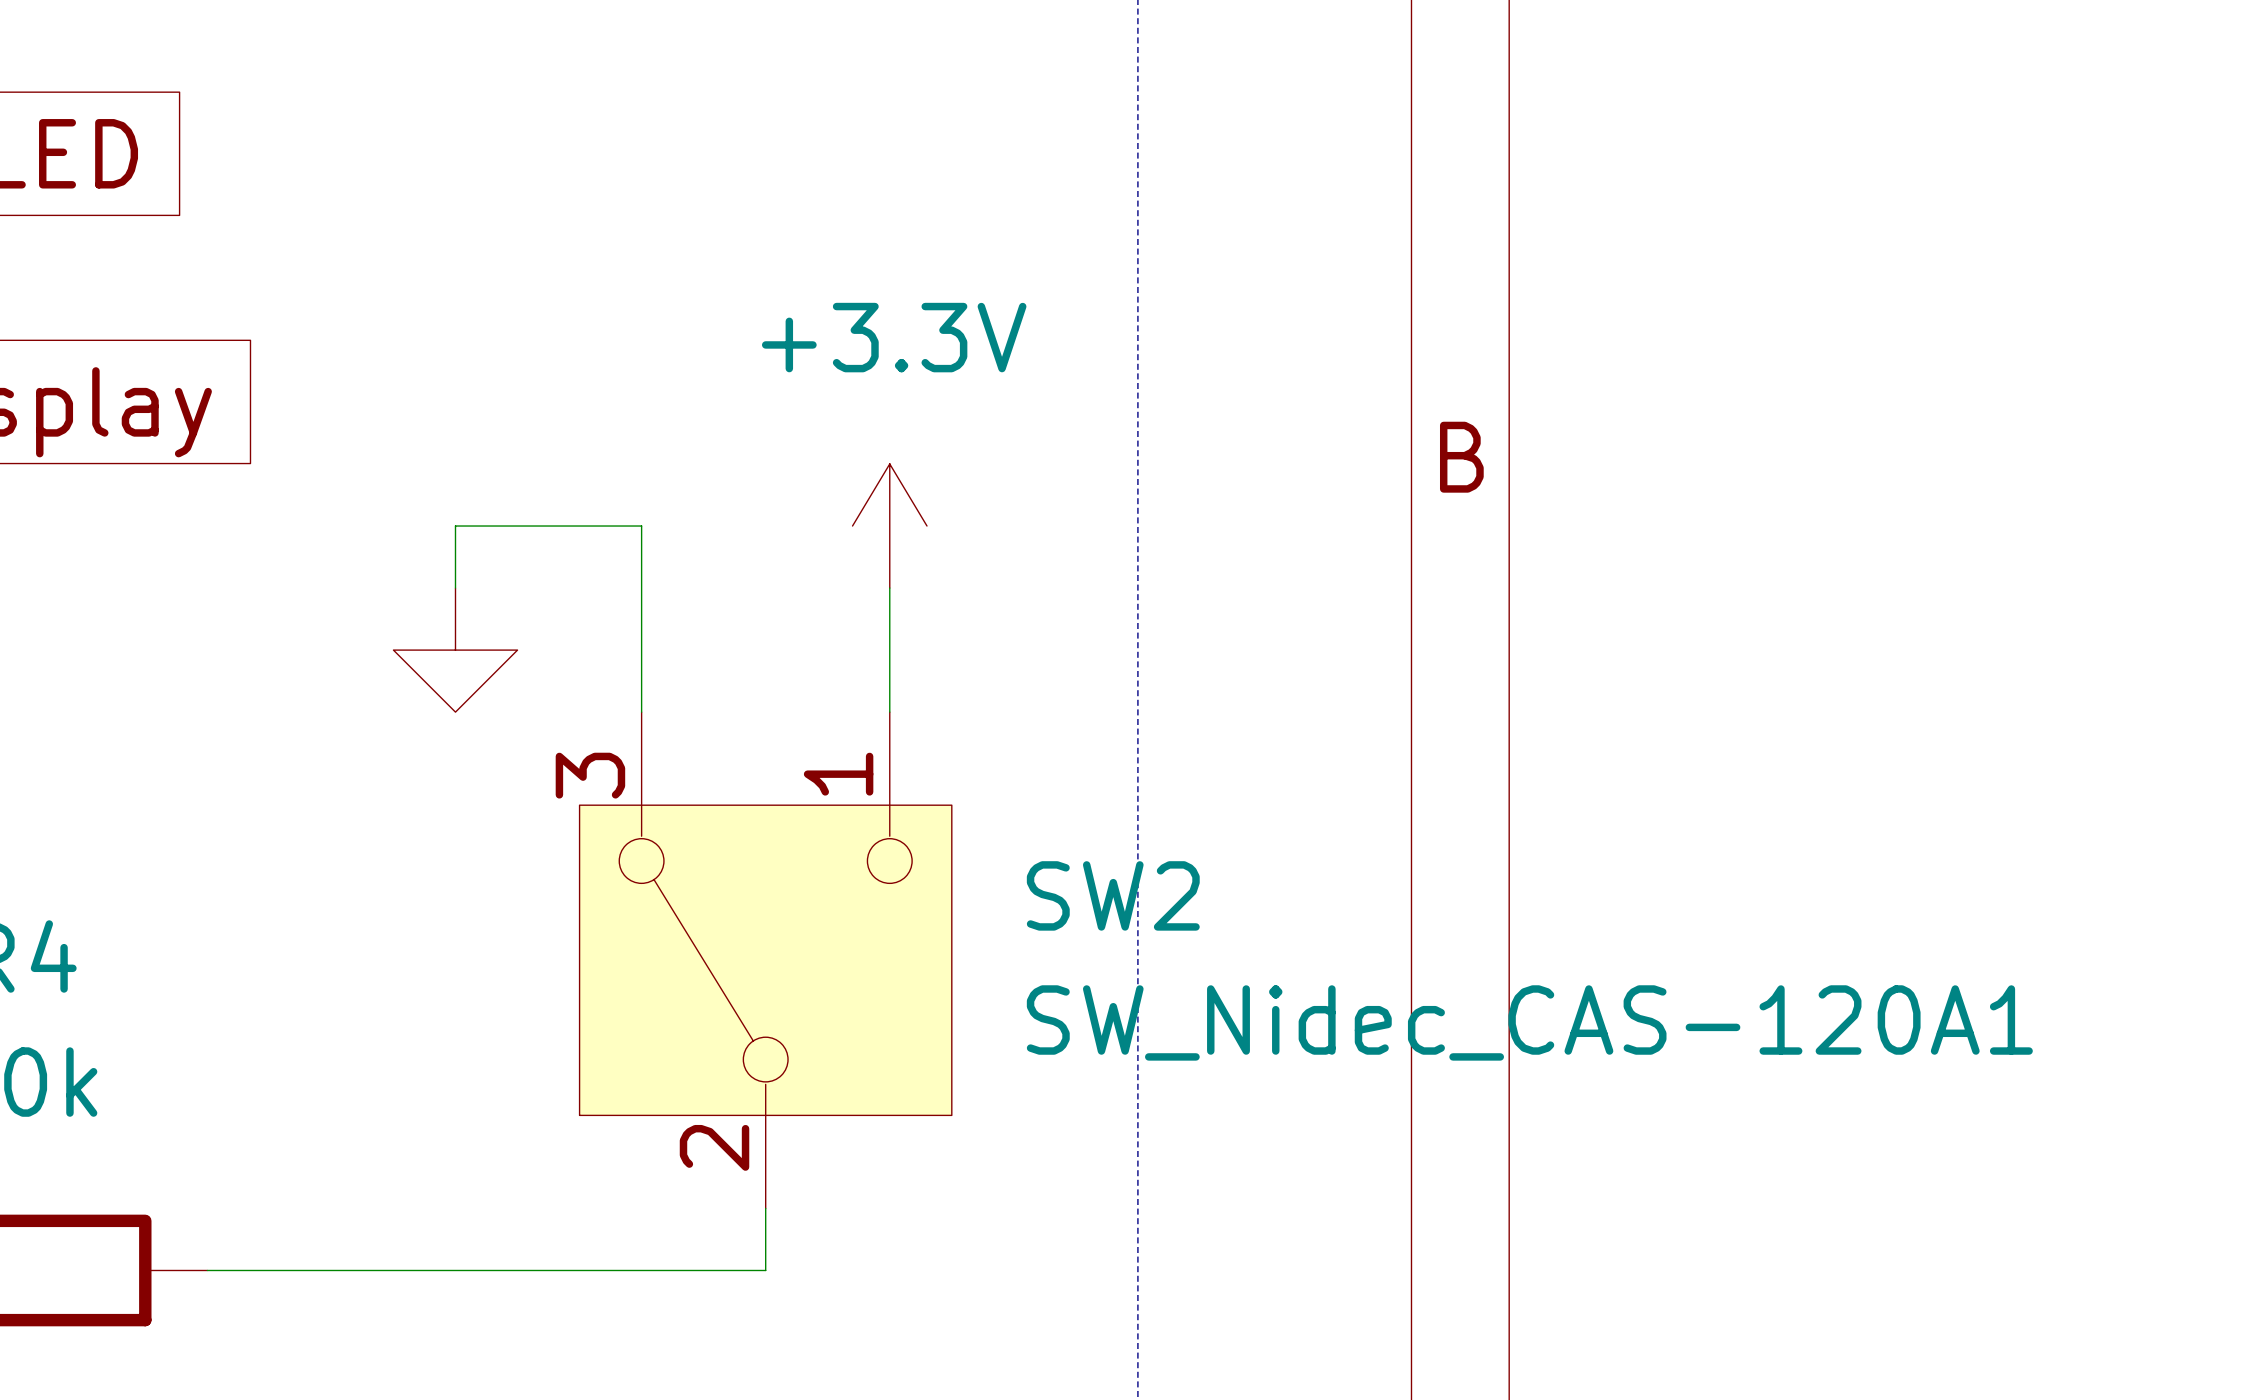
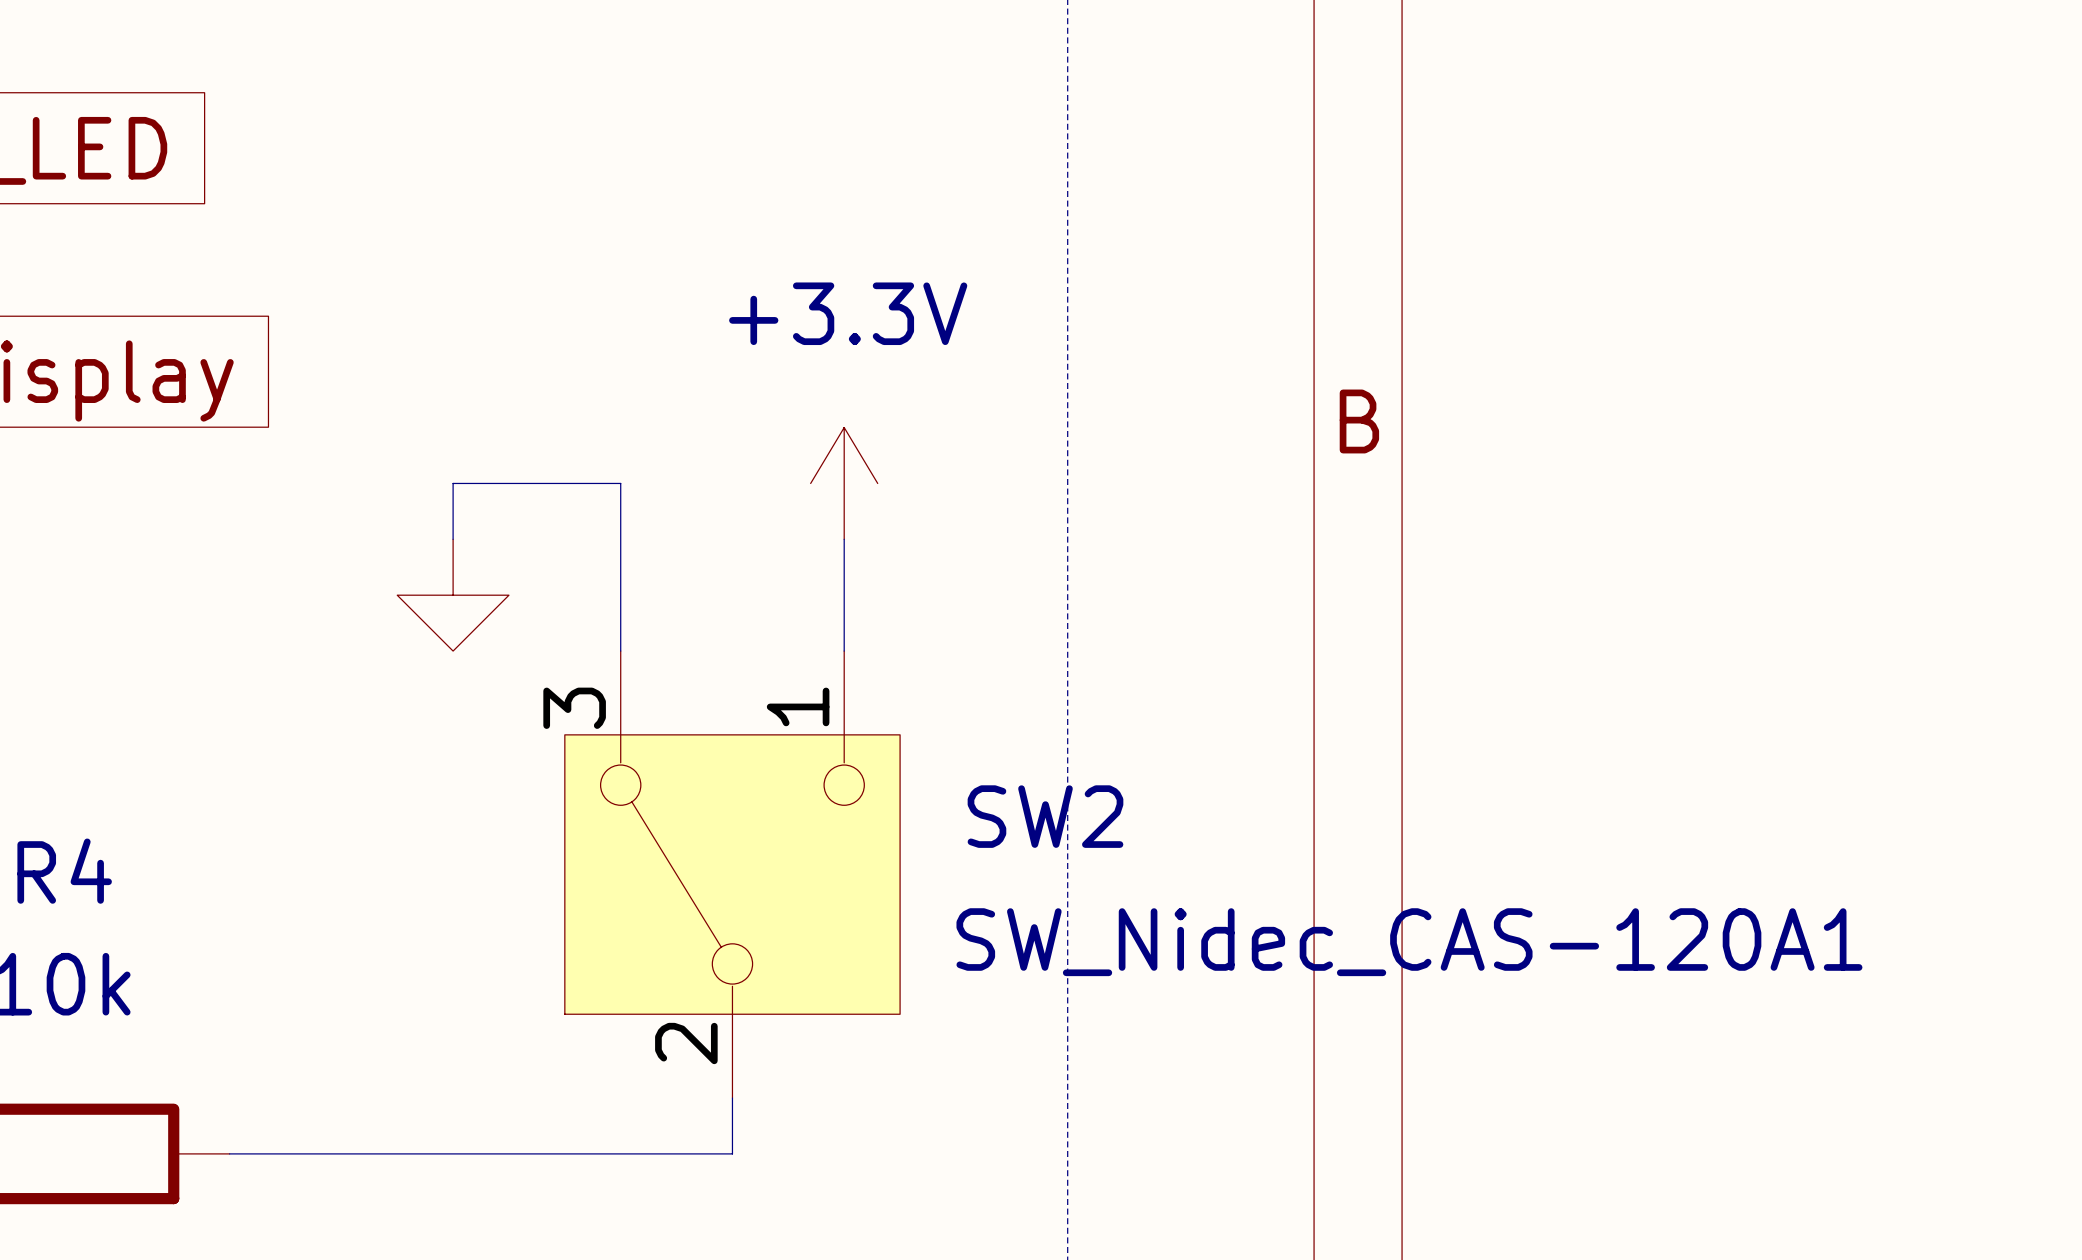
SW2 value position: SW_Nidec_CAS-120A1 (1529, 1022) -> SW_Nidec_CAS-120A1 (1409, 942)

